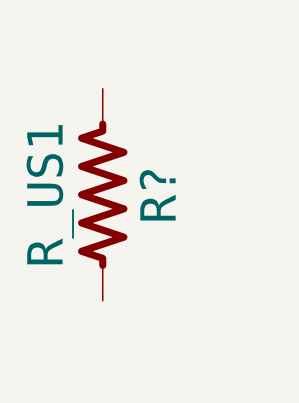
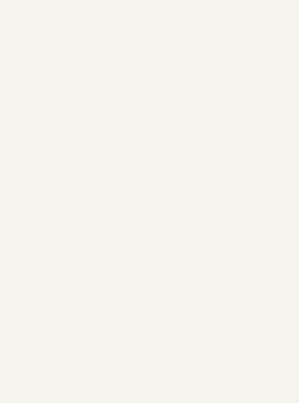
R?: R_US1 (102, 194) -> none

